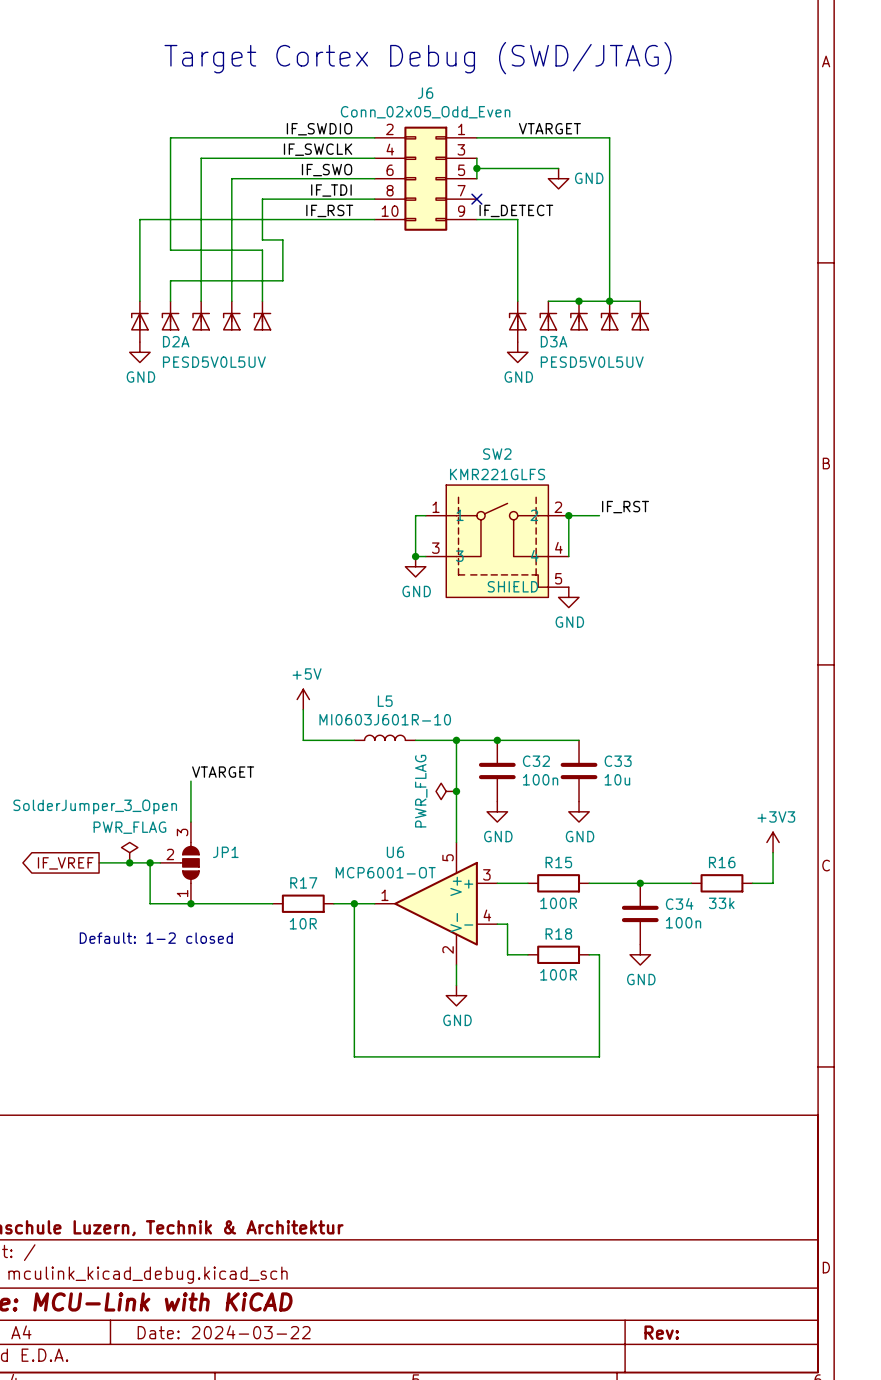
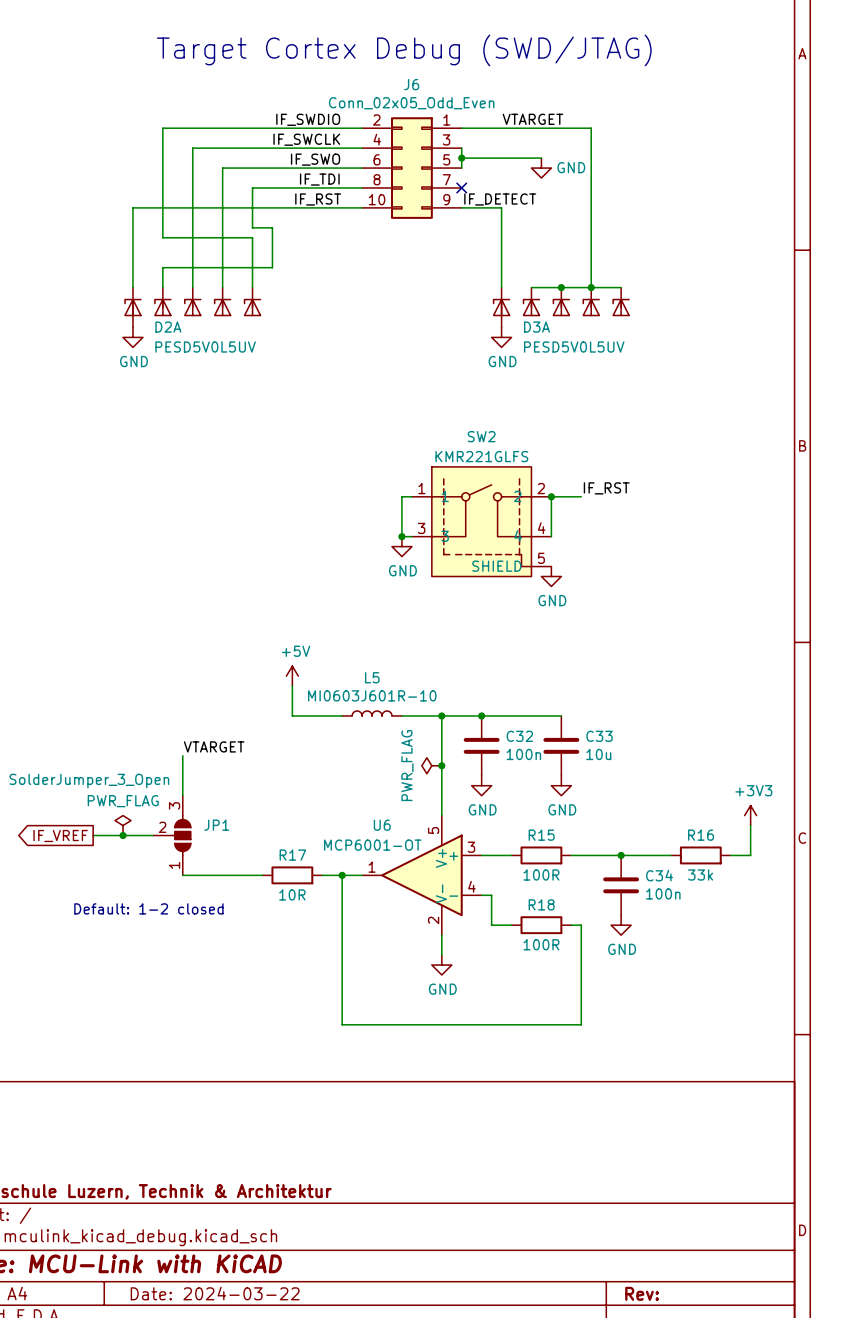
wire: (150, 862) (150, 903) (190, 903) -> none
junction: (150, 862) -> none
junction: (190, 903) -> none

